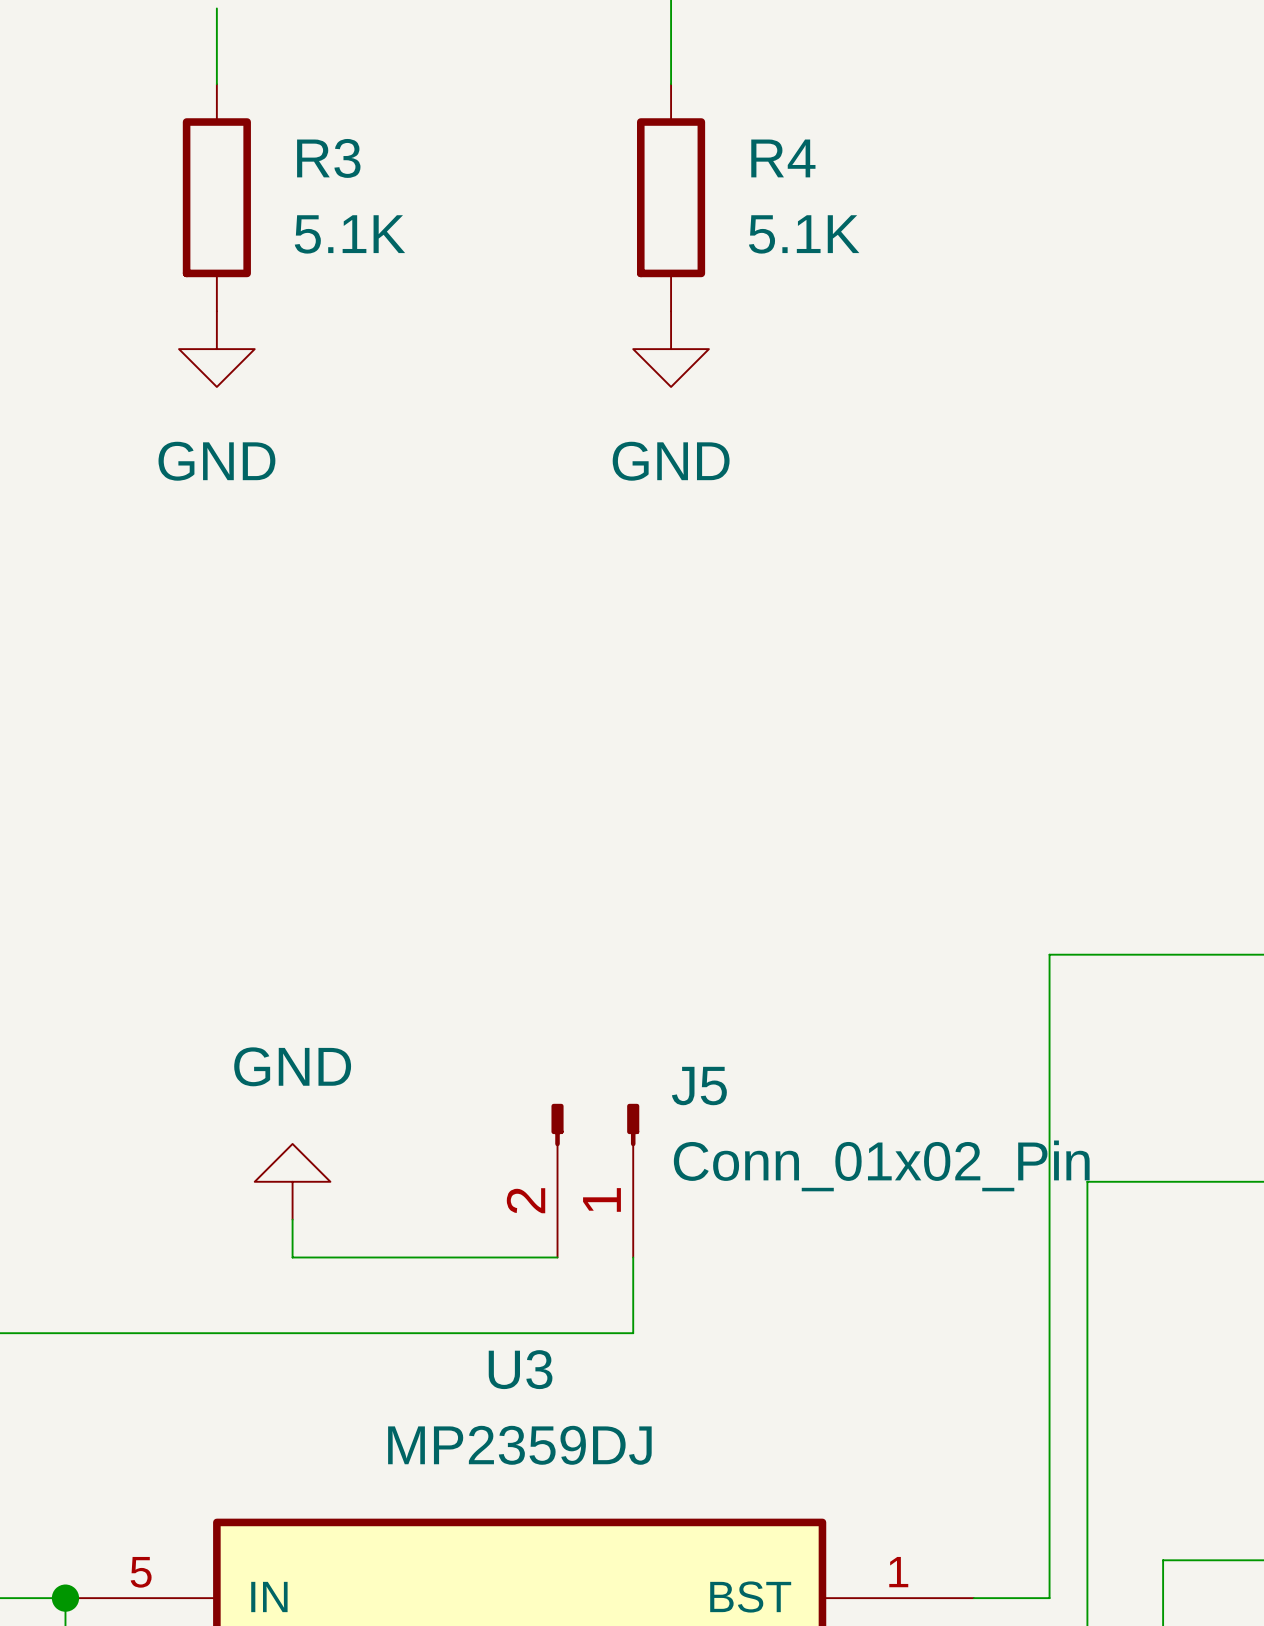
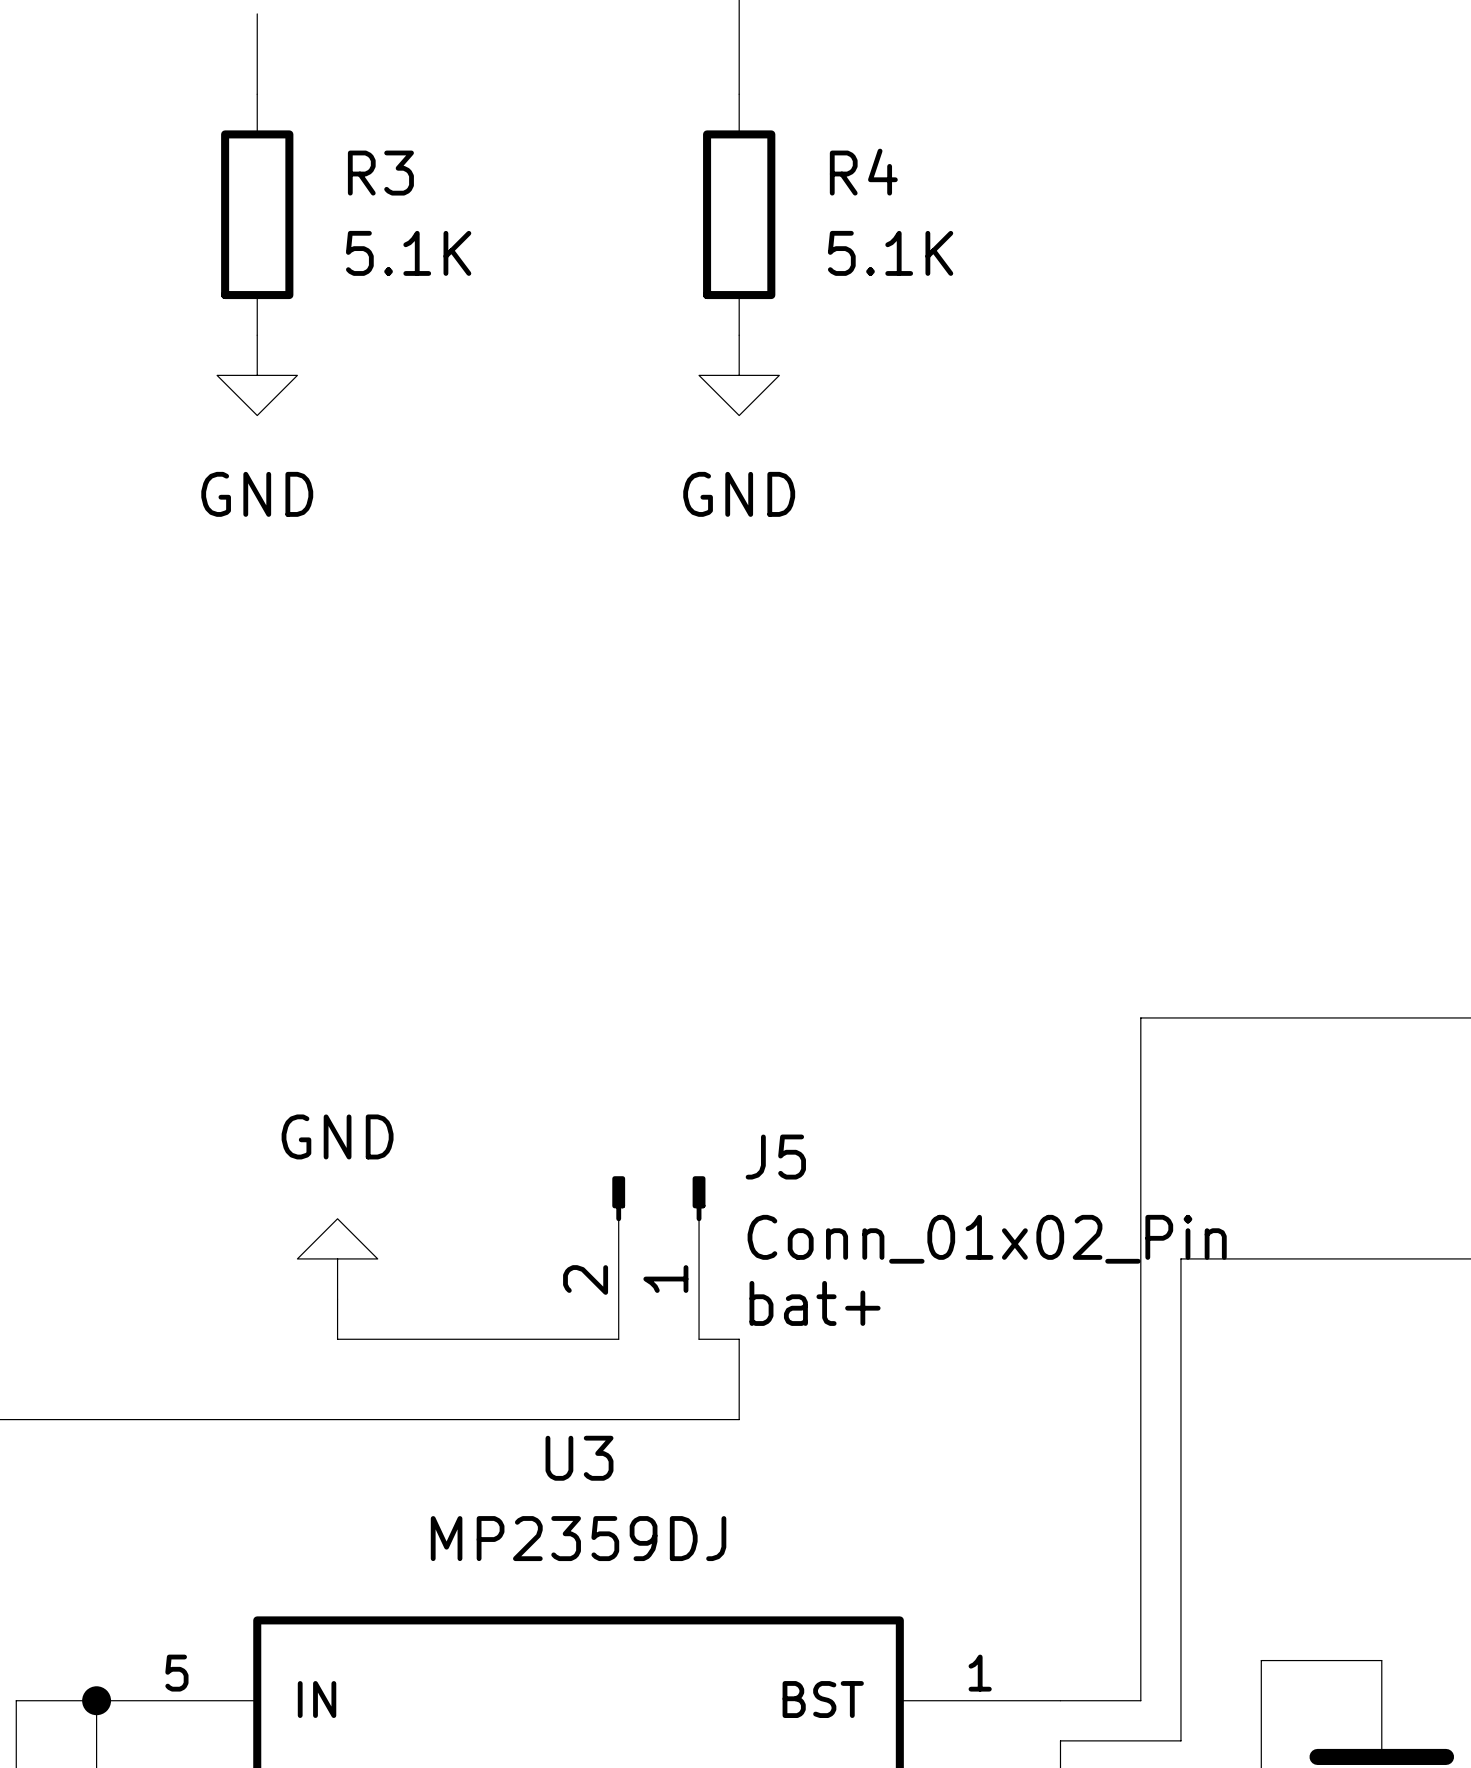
label: none -> bat+ (815, 1303)
wire: (633, 1257) (633, 1333) -> (699, 1339) (739, 1339) (739, 1419) (699, 1419)

